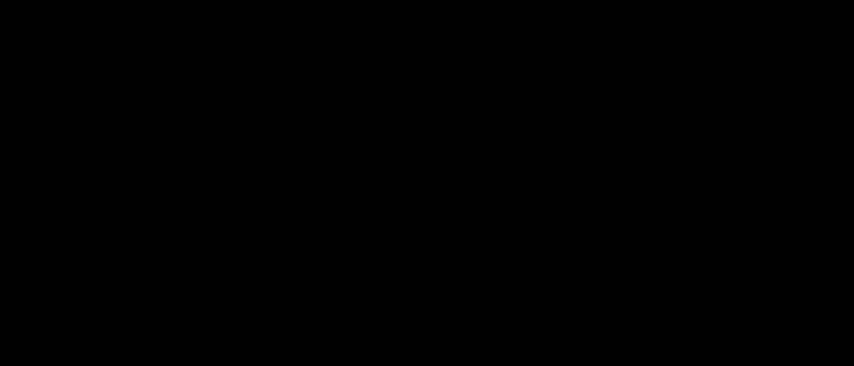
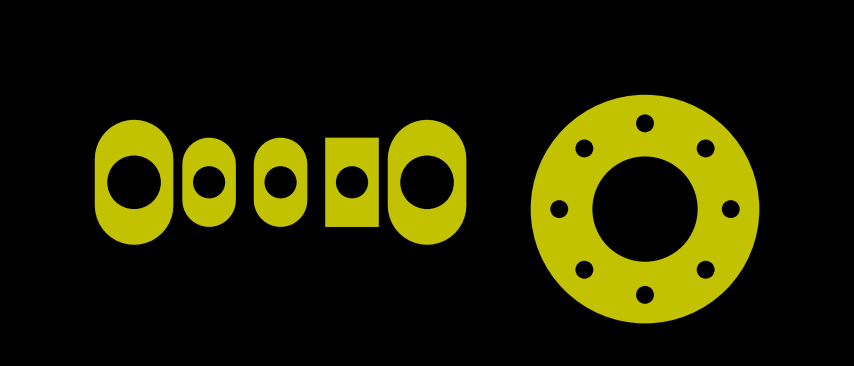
part: none -> (280, 182)
part: none -> (645, 209)

